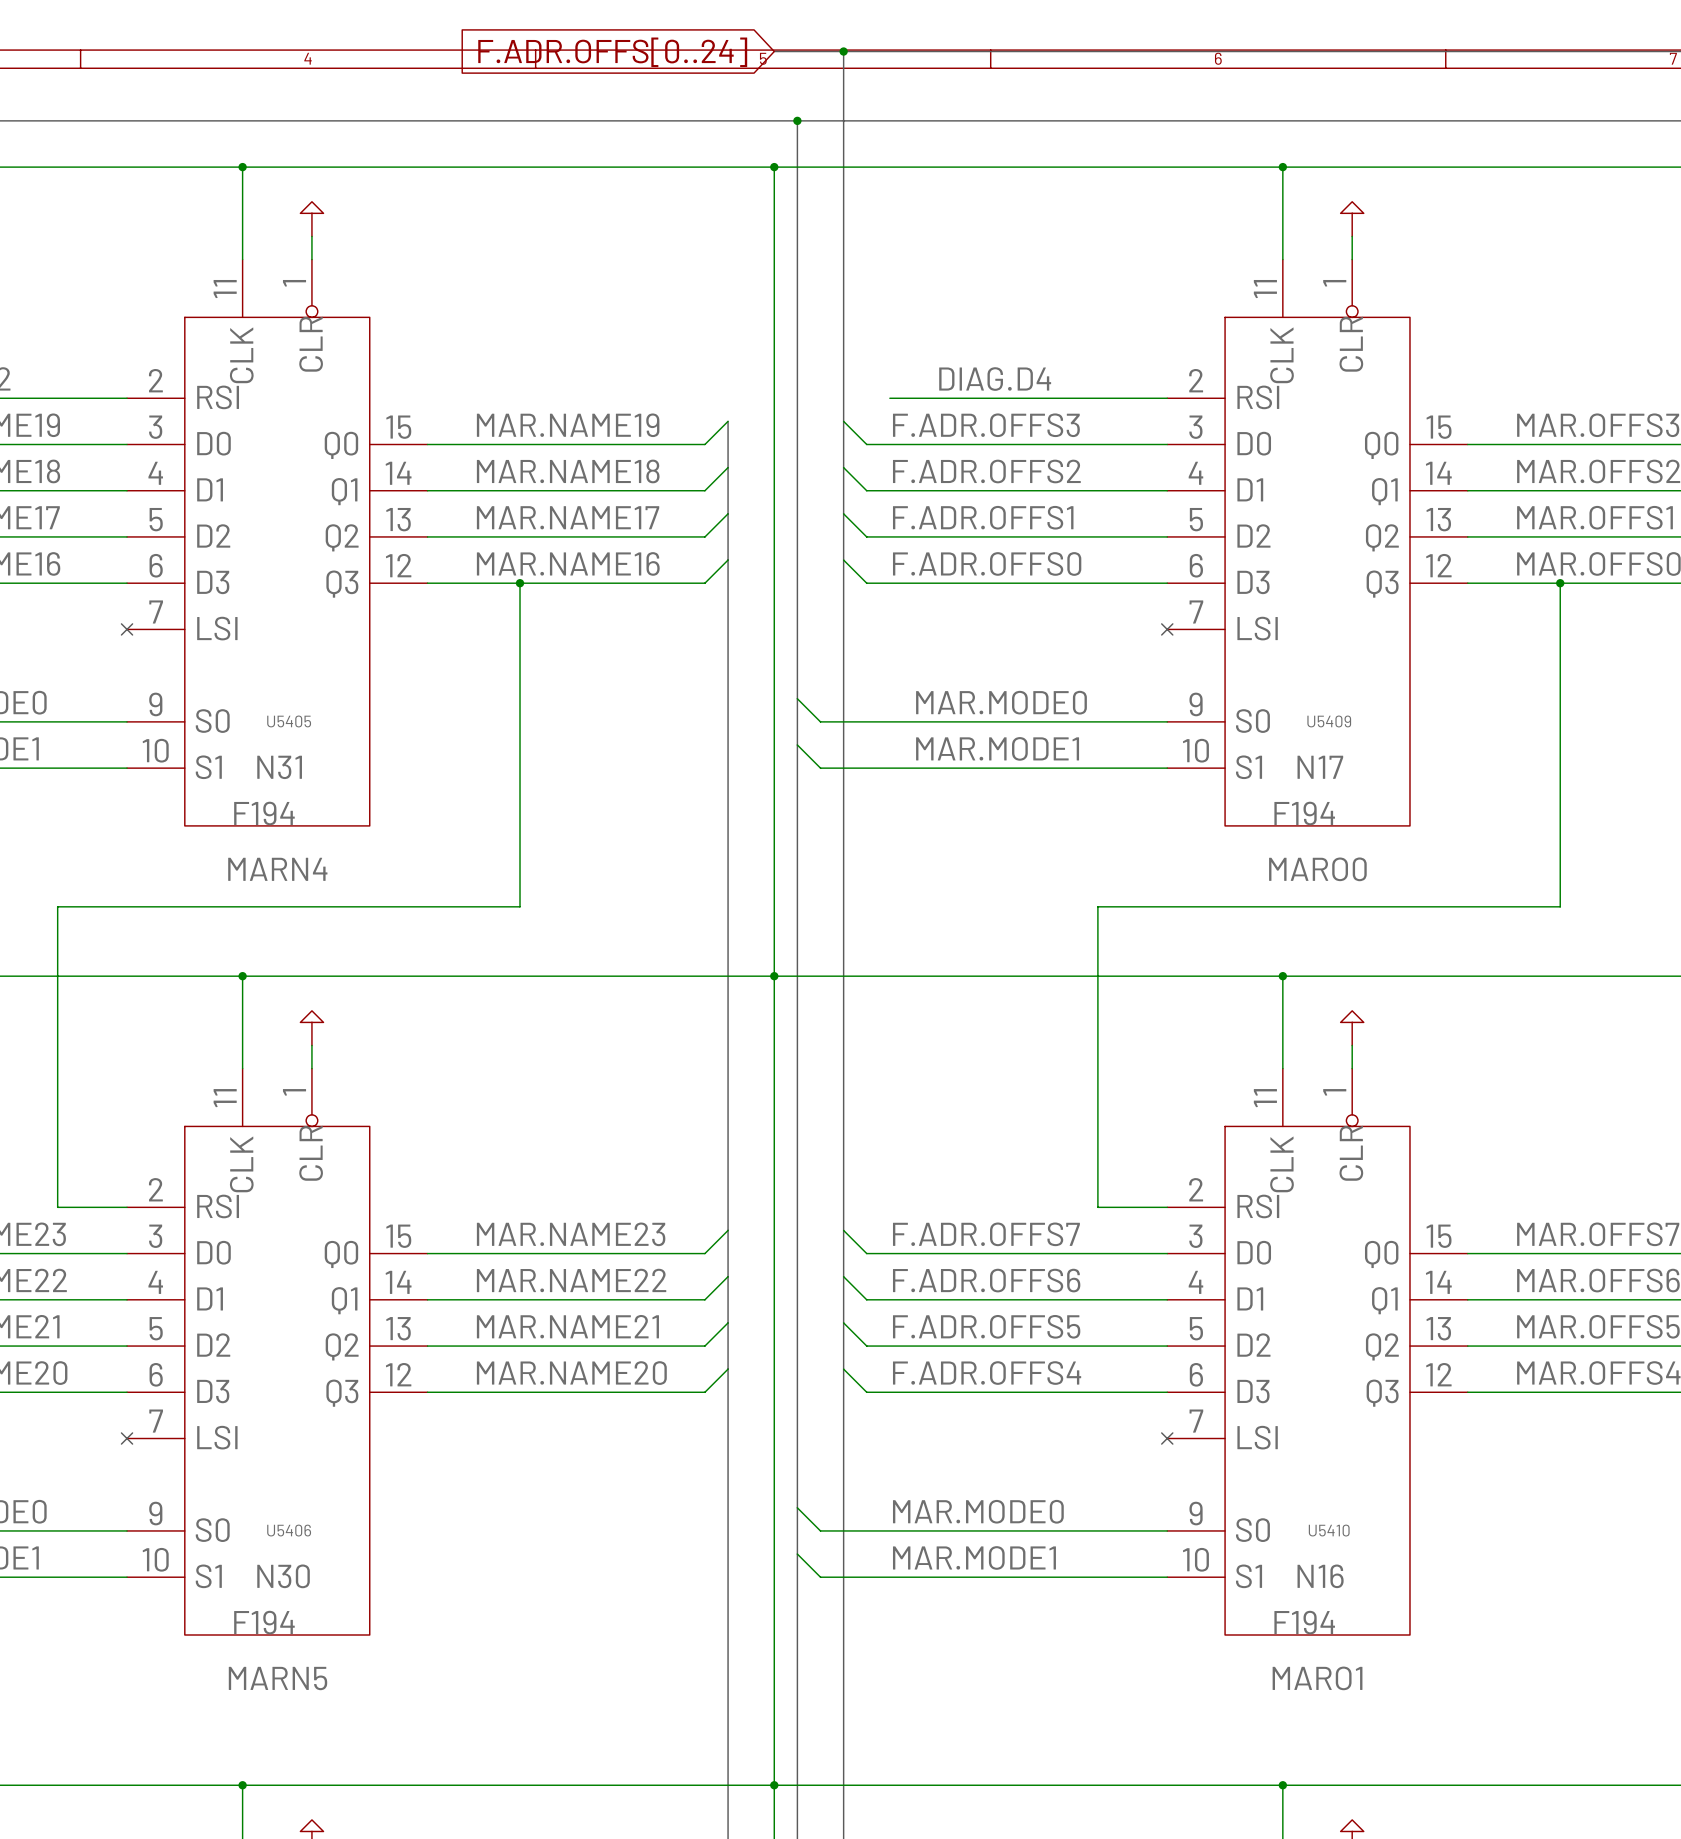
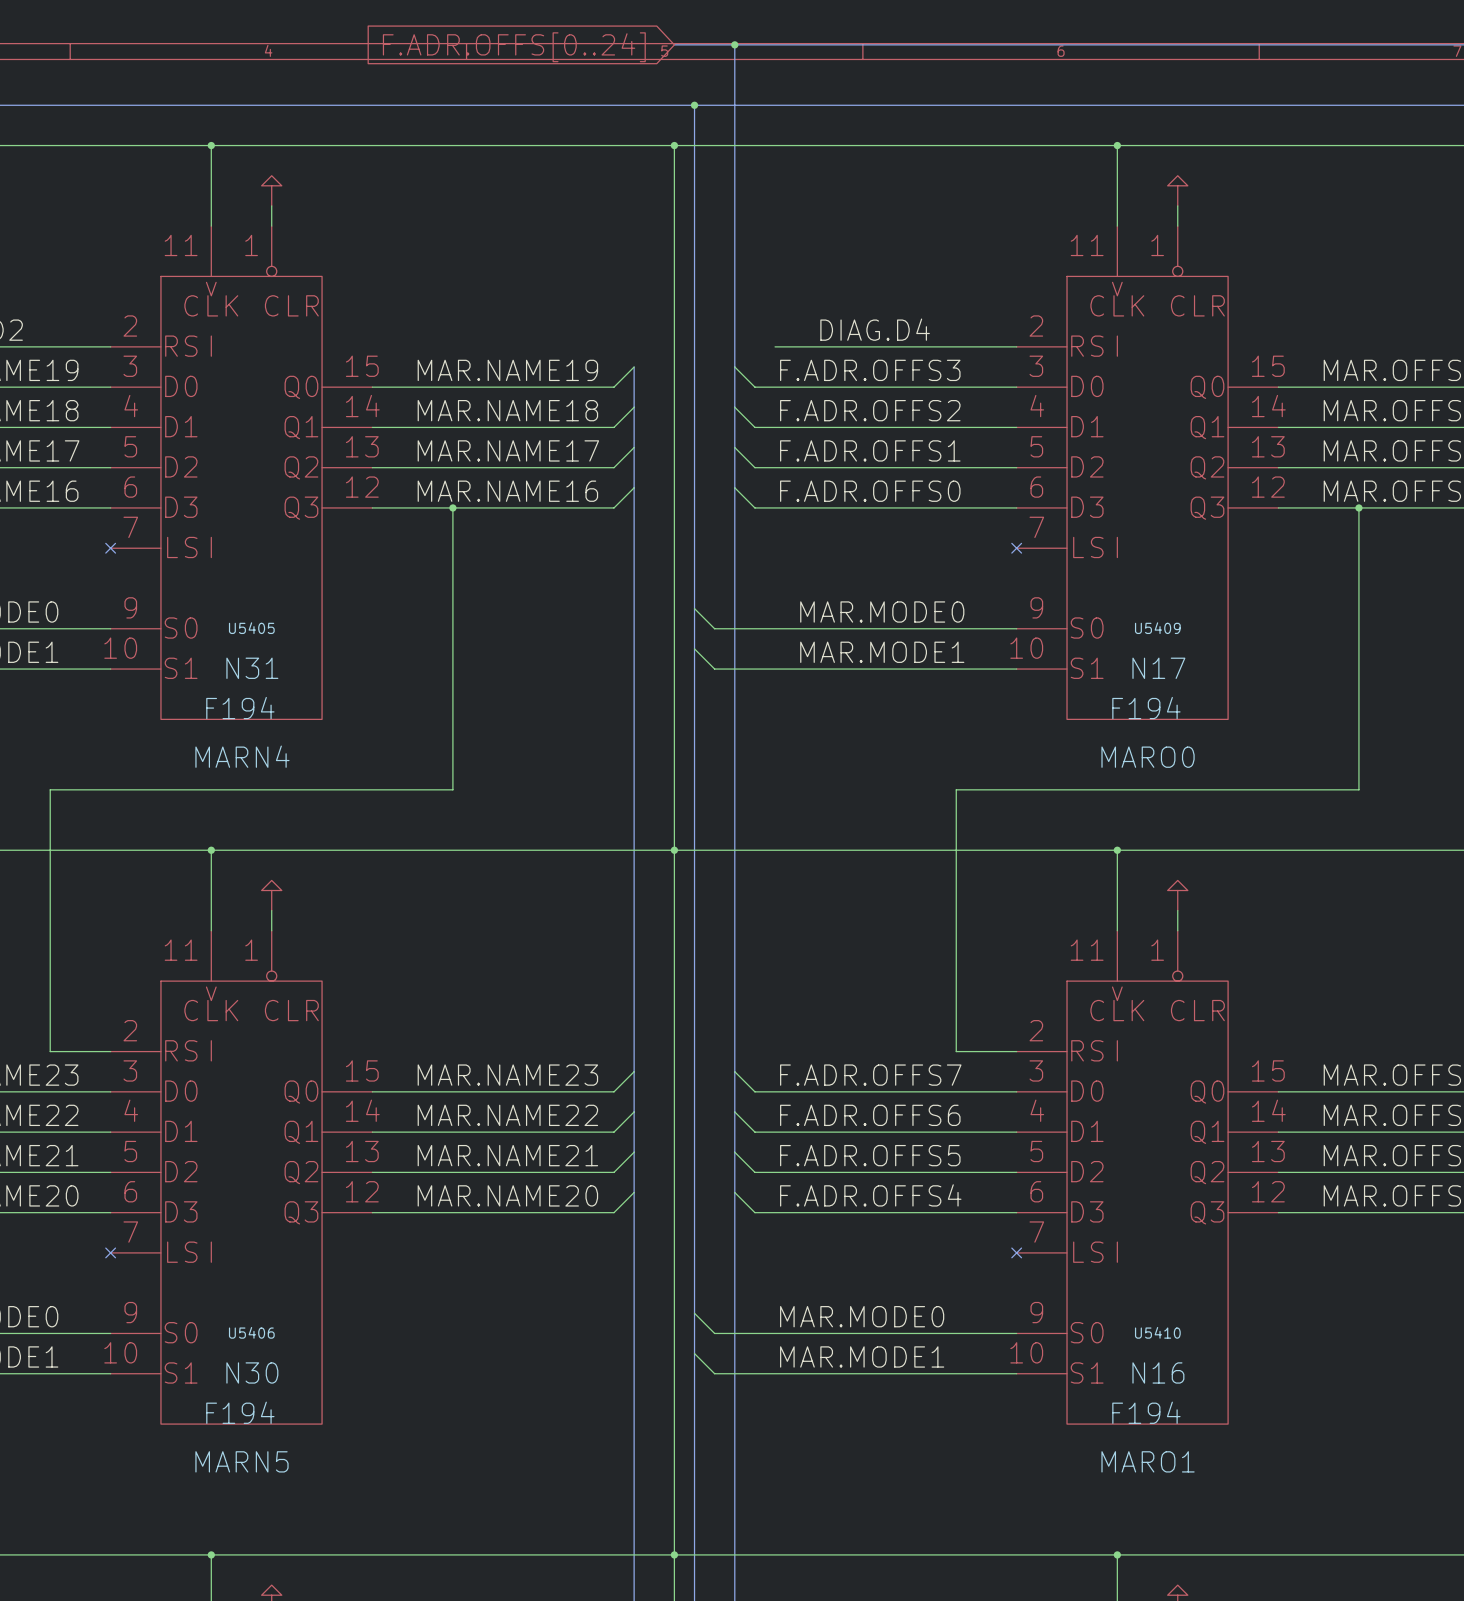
U5405 symbol: [127, 259, 428, 826] -> [110, 226, 373, 720]
U5409 symbol: [1167, 259, 1468, 826] -> [1016, 226, 1279, 720]
U5406 symbol: [127, 1068, 428, 1636] -> [110, 930, 373, 1425]
U5410 symbol: [1167, 1068, 1468, 1636] -> [1016, 930, 1279, 1425]

